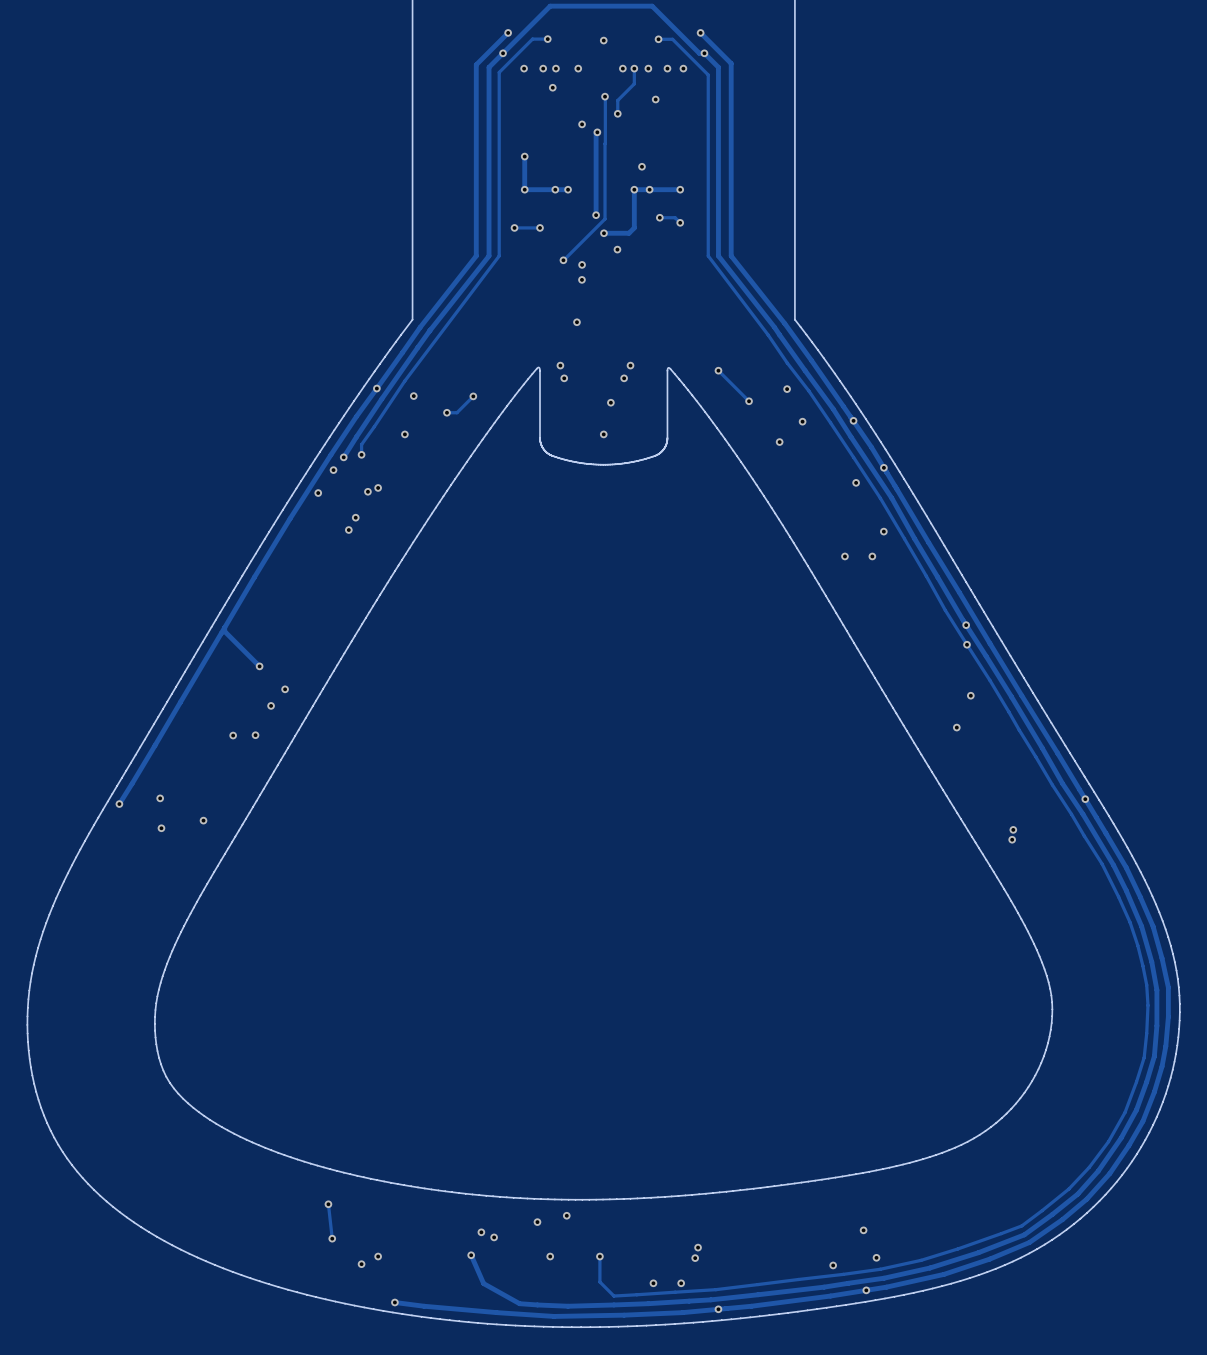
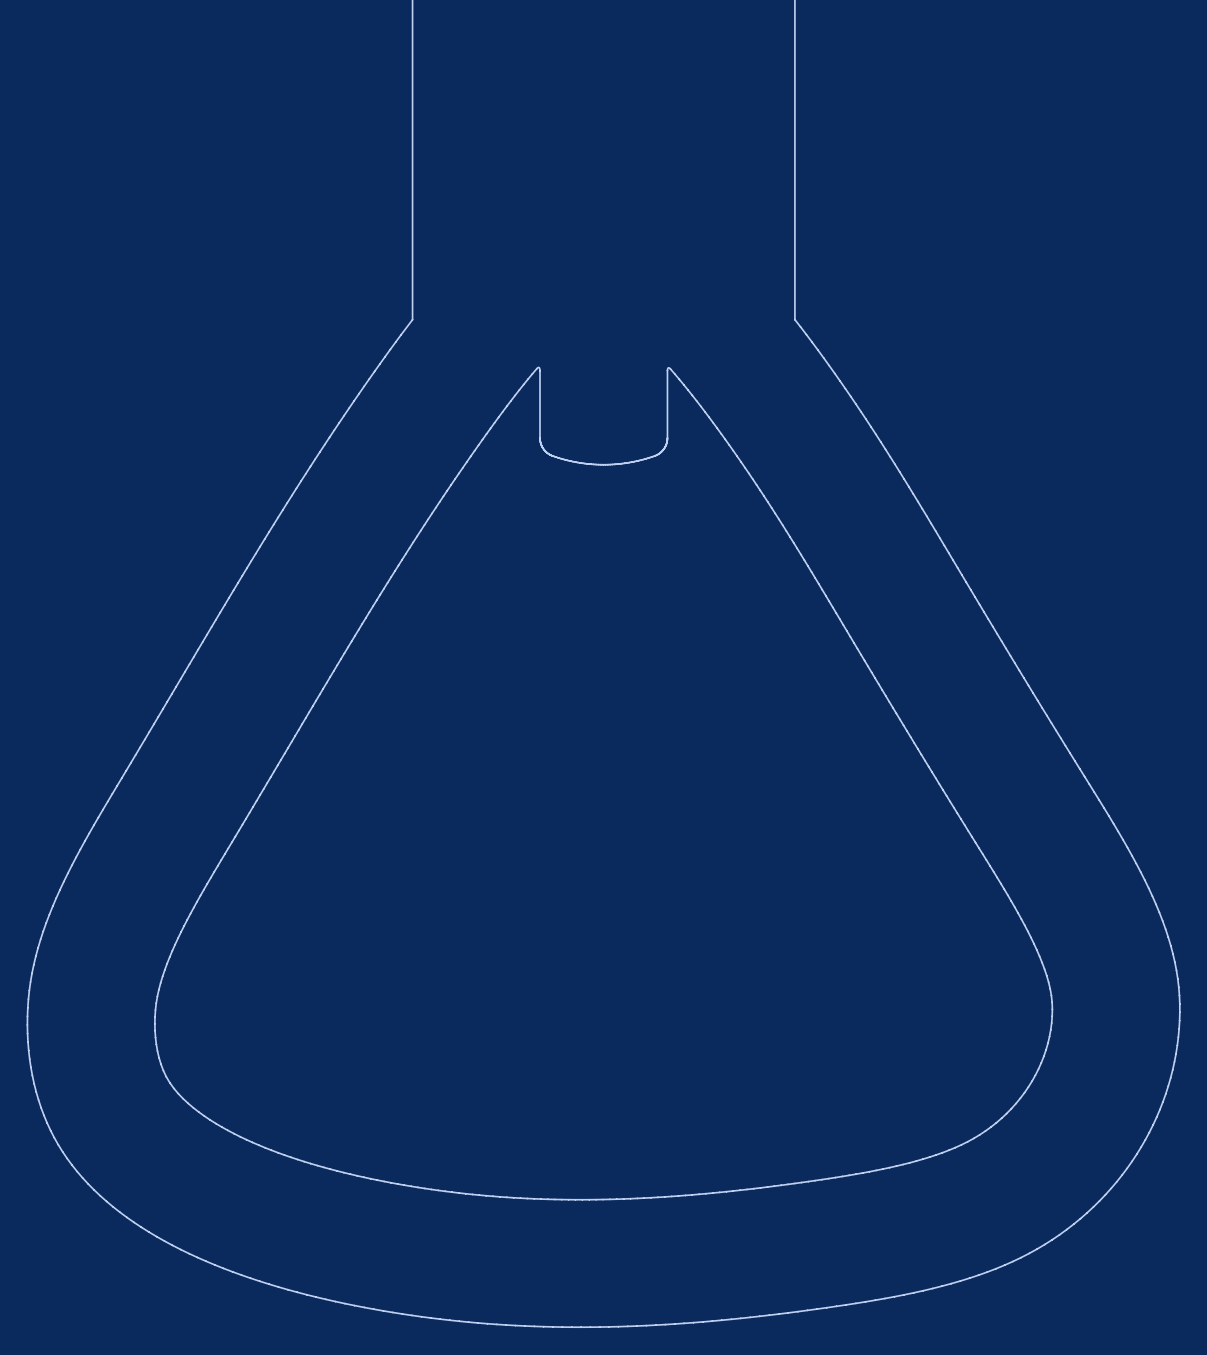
track: (508, 32) (476, 64) (476, 255) (420, 327) (330, 454) (254, 577) (119, 804) -> none
via: (508, 32) -> none
track: (700, 32) (731, 63) (731, 255) (784, 323) (871, 447) (1126, 867) (1153, 926) (1168, 987) (1168, 1016) (1162, 1066) (1142, 1121) (1109, 1173) (1086, 1199) (1062, 1219) (1029, 1242) (989, 1259) (944, 1274) (886, 1287) (830, 1296) (682, 1312) (554, 1316) (394, 1302) -> none
via: (700, 32) -> none
track: (547, 39) (532, 39) (499, 72) (499, 255) (404, 380) (361, 444) (361, 454) -> none
via: (547, 39) -> none
track: (658, 39) (672, 39) (708, 74) (708, 255) (808, 391) (880, 498) (945, 610) (1102, 863) (1130, 922) (1137, 945) (1146, 985) (1146, 1033) (1144, 1057) (1136, 1081) (1125, 1112) (1108, 1141) (1089, 1167) (1068, 1188) (1021, 1225) (921, 1260) (880, 1269) (715, 1289) (613, 1296) (599, 1282) (599, 1256) -> none
via: (658, 39) -> none
via: (603, 40) -> none
via: (503, 53) -> none
via: (704, 53) -> none
via: (524, 68) -> none
via: (543, 68) -> none
via: (555, 68) -> none
via: (578, 68) -> none
via: (622, 68) -> none
track: (634, 68) (634, 83) (617, 100) (617, 113) -> none
via: (634, 68) -> none
via: (648, 68) -> none
via: (667, 68) -> none
via: (683, 68) -> none
via: (552, 87) -> none
track: (605, 96) (605, 219) (563, 260) -> none
via: (605, 96) -> none
via: (655, 99) -> none
via: (617, 113) -> none
via: (582, 124) -> none
track: (597, 132) (596, 215) -> none
via: (597, 132) -> none
track: (524, 156) (524, 189) (568, 189) -> none
via: (524, 156) -> none
via: (641, 166) -> none
via: (524, 189) -> none
via: (555, 189) -> none
via: (568, 189) -> none
via: (634, 189) -> none
via: (649, 189) -> none
track: (680, 189) (634, 189) (634, 227) (629, 233) (603, 233) -> none
via: (680, 189) -> none
via: (596, 215) -> none
track: (659, 217) (675, 217) (680, 222) -> none
via: (659, 217) -> none
via: (680, 222) -> none
via: (514, 227) -> none
track: (540, 227) (514, 227) -> none
via: (540, 227) -> none
via: (603, 233) -> none
via: (617, 249) -> none
via: (563, 260) -> none
via: (582, 264) -> none
via: (581, 279) -> none
via: (576, 322) -> none
track: (430, 329) (343, 457) -> none
track: (429, 331) (489, 255) (489, 67) (550, 6) (652, 6) (699, 53) (704, 53) (718, 67) (718, 255) (774, 327) (833, 408) (891, 498) (963, 620) (1113, 865) (1141, 926) (1151, 962) (1156, 990) (1154, 1056) (1136, 1109) (1121, 1137) (1098, 1171) (1077, 1194) (1024, 1234) (978, 1252) (930, 1268) (884, 1278) (824, 1287) (710, 1299) (568, 1306) (519, 1303) (483, 1283) (471, 1255) -> none
via: (560, 365) -> none
via: (630, 365) -> none
track: (718, 370) (749, 401) -> none
via: (718, 370) -> none
via: (564, 378) -> none
via: (624, 378) -> none
via: (376, 388) -> none
via: (787, 389) -> none
via: (413, 396) -> none
track: (473, 396) (456, 412) (446, 412) -> none
via: (473, 396) -> none
via: (749, 401) -> none
via: (610, 402) -> none
via: (446, 412) -> none
via: (853, 420) -> none
via: (802, 421) -> none
via: (404, 434) -> none
via: (603, 434) -> none
via: (779, 442) -> none
via: (361, 454) -> none
via: (343, 457) -> none
via: (883, 467) -> none
via: (333, 470) -> none
via: (856, 482) -> none
via: (378, 487) -> none
via: (367, 491) -> none
via: (318, 493) -> none
via: (355, 517) -> none
via: (348, 530) -> none
via: (883, 531) -> none
via: (844, 556) -> none
via: (872, 556) -> none
via: (966, 625) -> none
track: (224, 627) (224, 631) (259, 666) -> none
via: (967, 644) -> none
via: (259, 666) -> none
via: (285, 689) -> none
via: (970, 695) -> none
via: (271, 705) -> none
via: (956, 727) -> none
via: (233, 735) -> none
via: (255, 735) -> none
via: (160, 798) -> none
via: (1085, 799) -> none
via: (119, 804) -> none
via: (203, 820) -> none
via: (161, 828) -> none
via: (1013, 829) -> none
via: (1012, 839) -> none
track: (328, 1204) (332, 1238) -> none
via: (328, 1204) -> none
via: (566, 1215) -> none
via: (537, 1222) -> none
via: (863, 1230) -> none
via: (481, 1232) -> none
via: (494, 1237) -> none
via: (332, 1238) -> none
via: (698, 1247) -> none
via: (471, 1255) -> none
via: (378, 1256) -> none
via: (550, 1256) -> none
via: (599, 1256) -> none
via: (876, 1257) -> none
via: (695, 1258) -> none
via: (361, 1264) -> none
via: (833, 1265) -> none
via: (653, 1283) -> none
via: (681, 1283) -> none
via: (866, 1290) -> none
via: (394, 1302) -> none
via: (718, 1309) -> none

